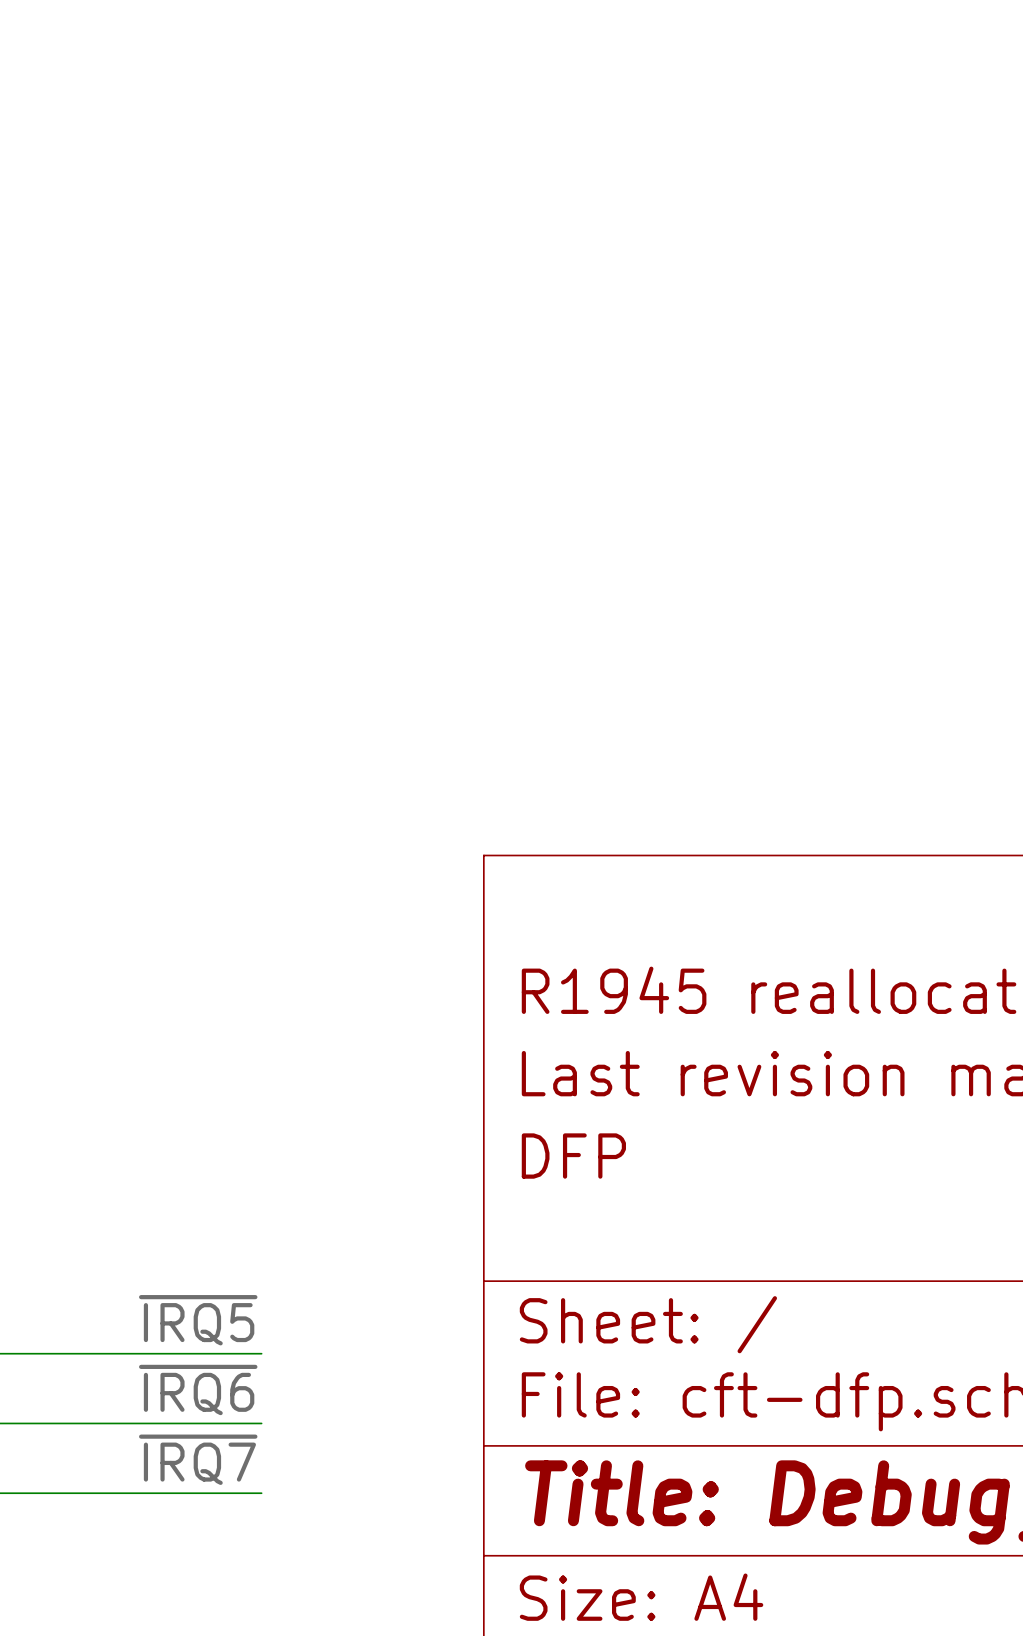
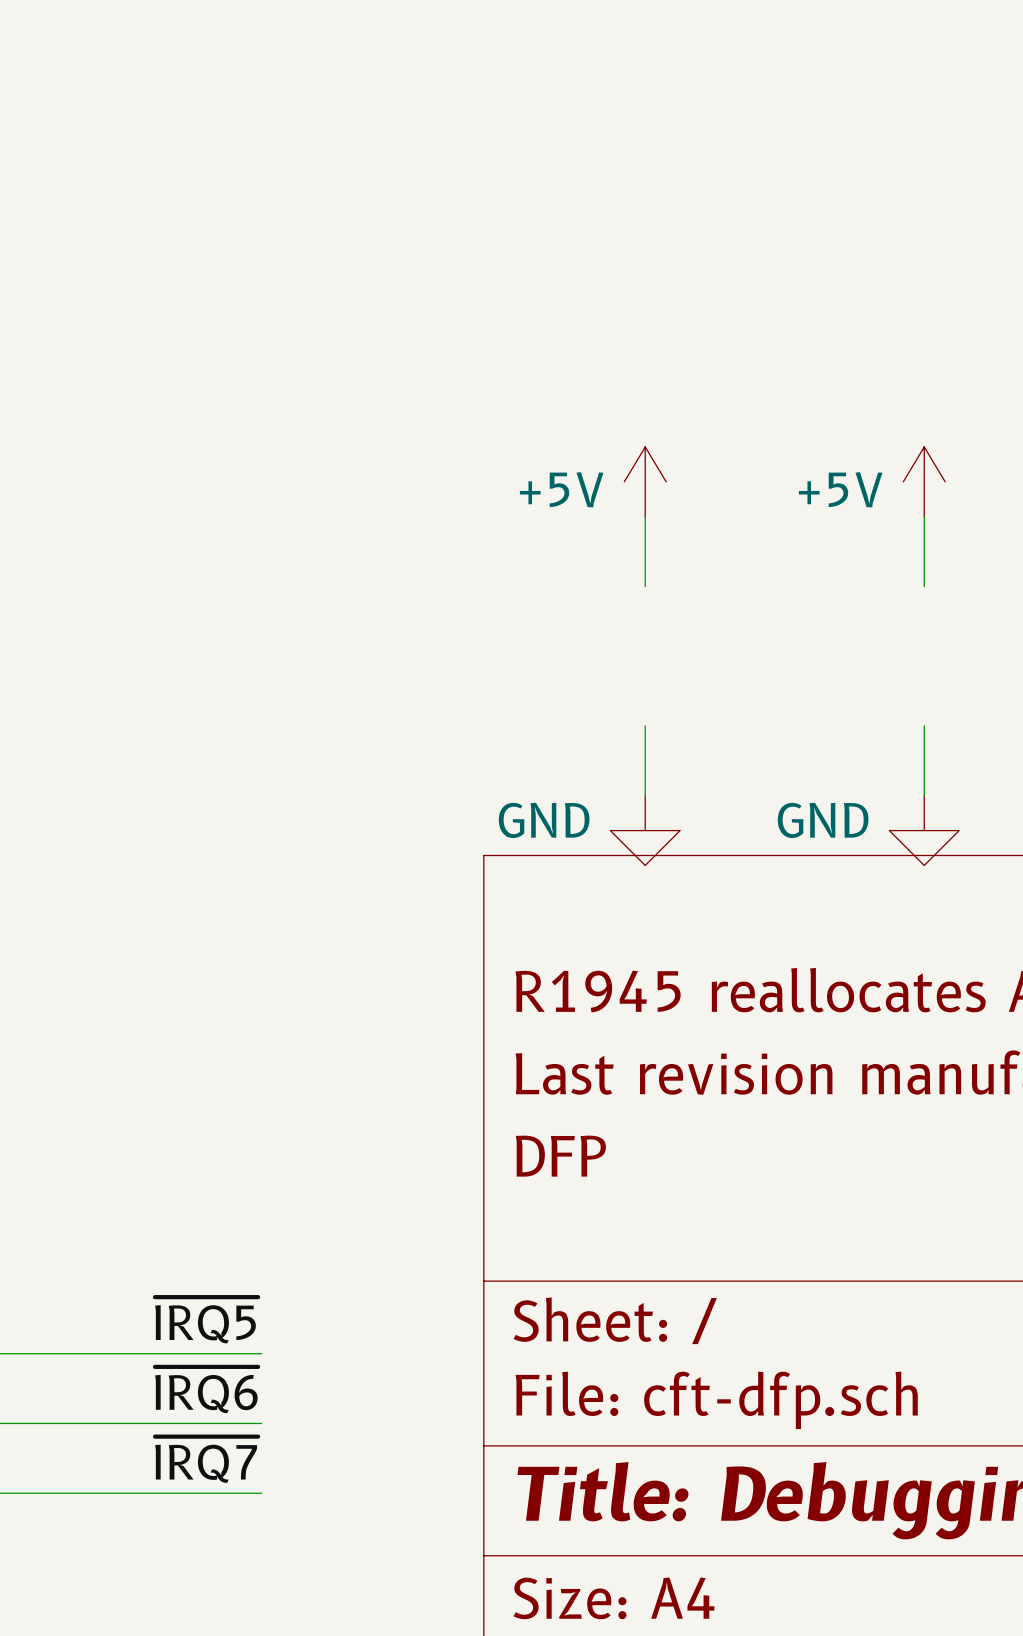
power symbol: none -> +5V (645, 481)
power symbol: none -> +5V (924, 481)
wire: none -> (645, 516) (645, 586)
wire: none -> (924, 516) (924, 586)
wire: none -> (645, 725) (645, 795)
wire: none -> (924, 725) (924, 795)
power symbol: none -> GND (645, 830)
power symbol: none -> GND (924, 830)

